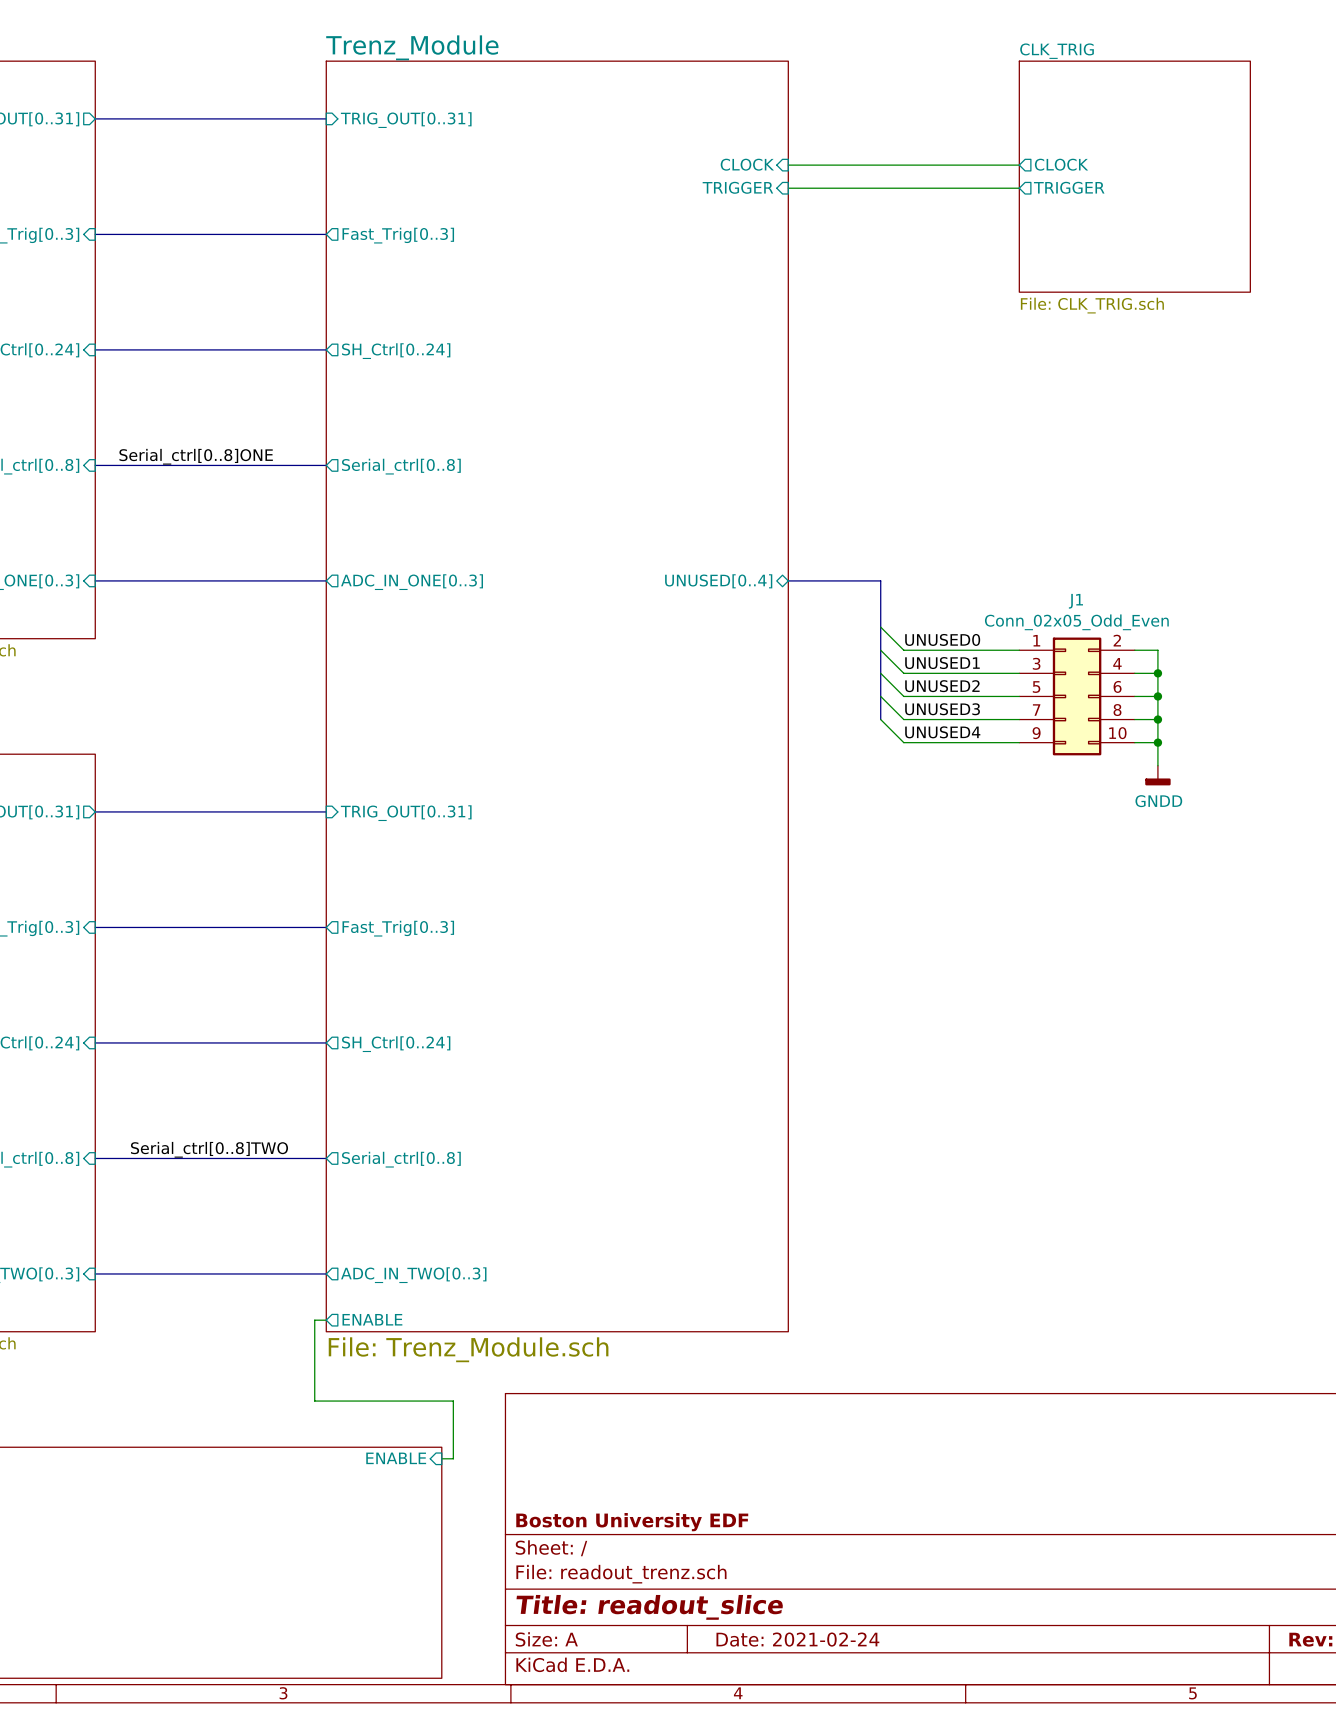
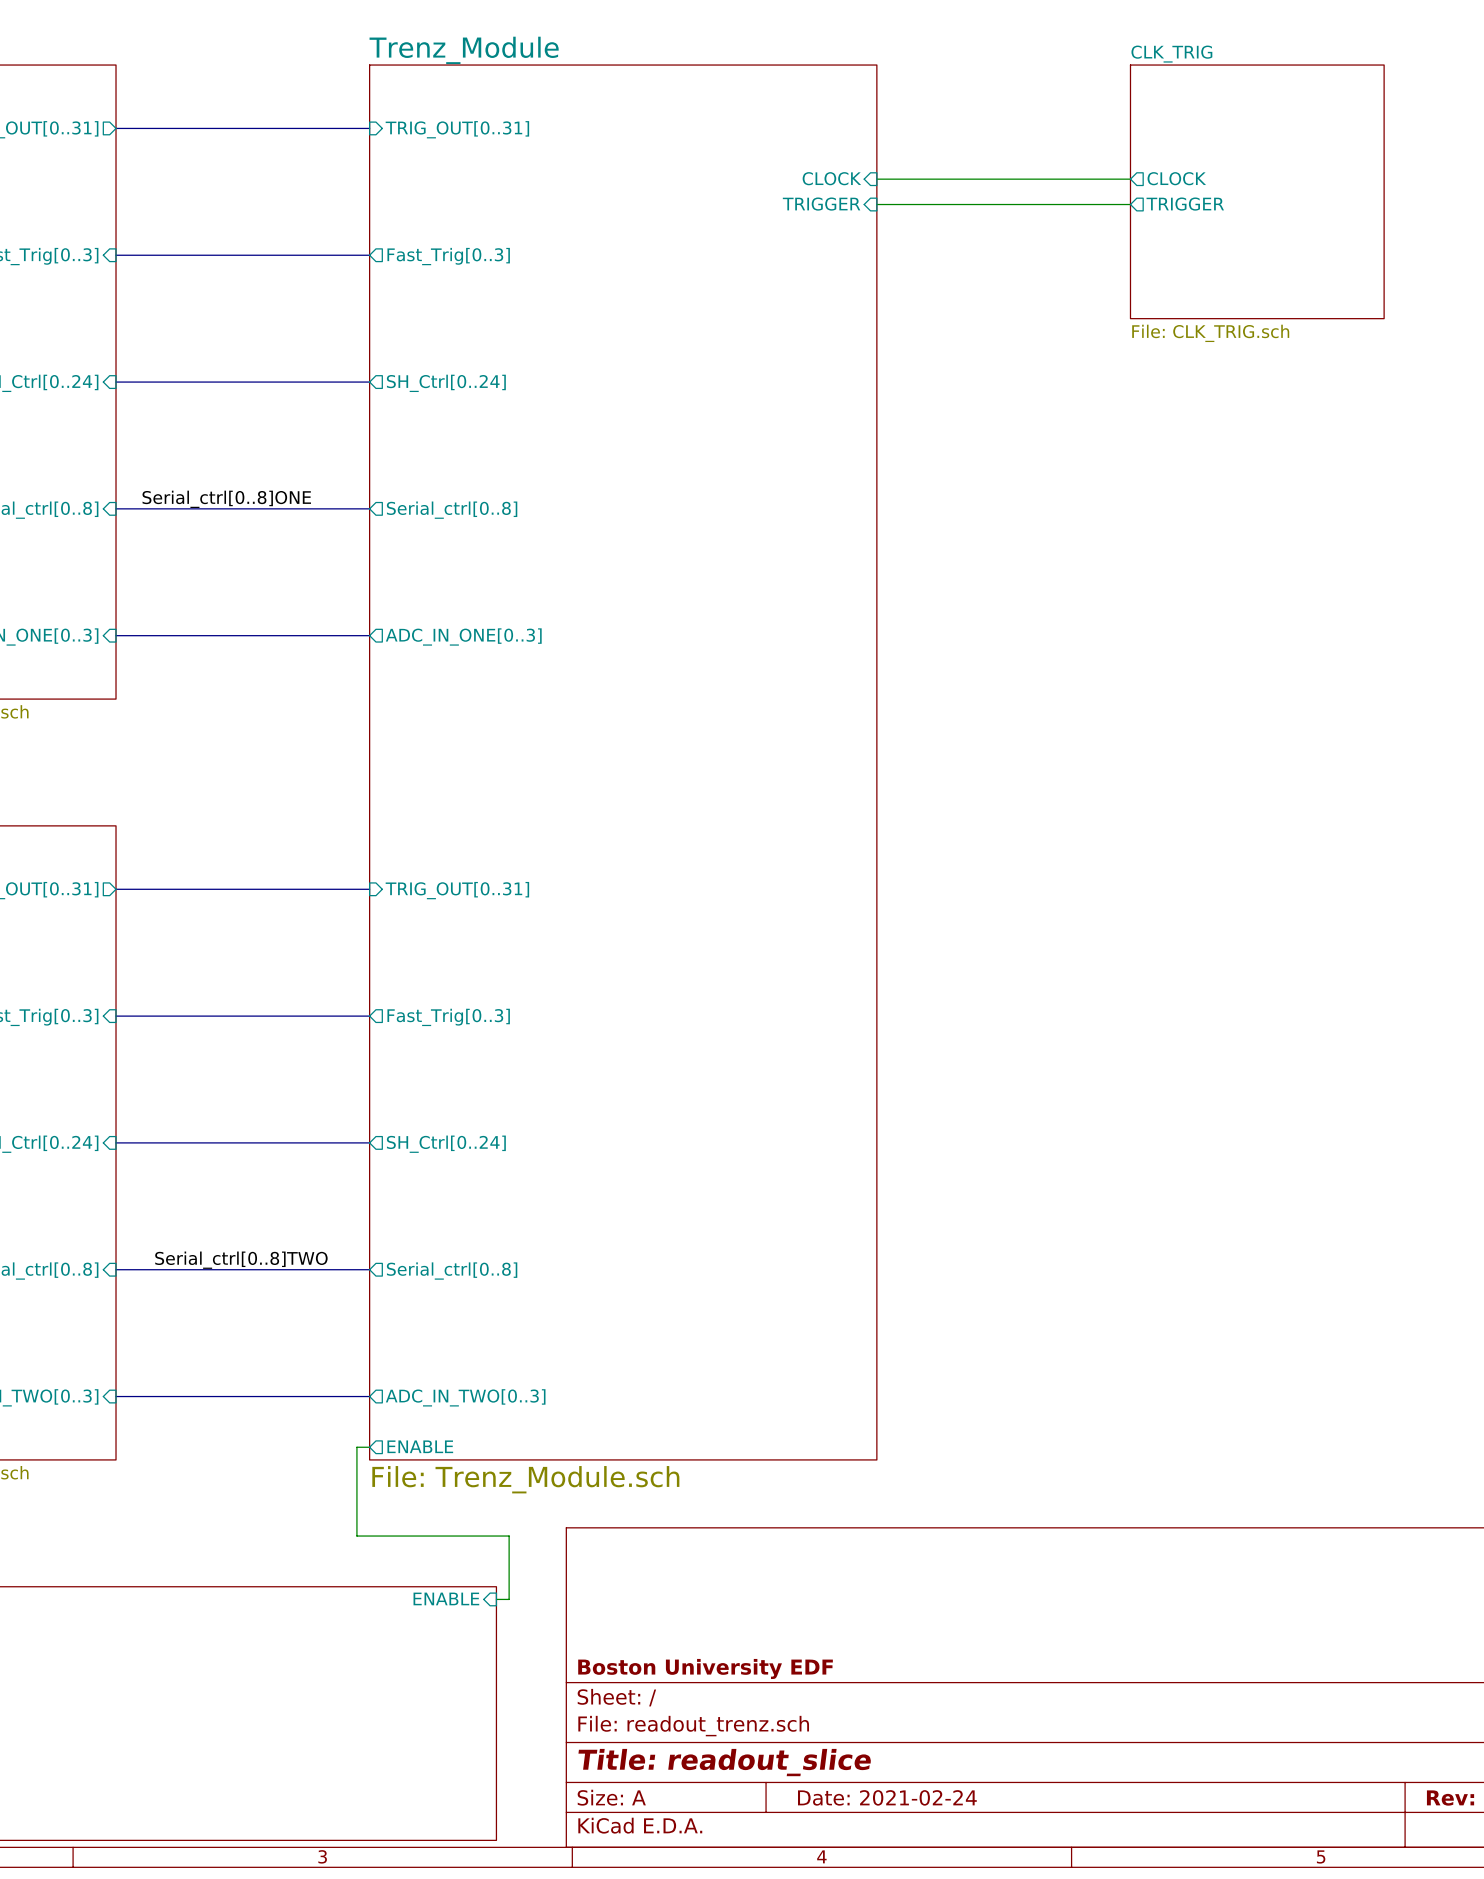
bus: (788, 580) (880, 580) (880, 719) -> none
sheet pin: UNUSED[0..4] (718, 581) -> none
wire: (880, 627) (903, 650) (1019, 650) -> none
label: UNUSED0 (942, 639) -> none
wire: (880, 650) (903, 673) (1019, 673) -> none
wire: (1134, 650) (1157, 650) (1157, 765) -> none
label: UNUSED1 (942, 663) -> none
wire: (880, 673) (903, 696) (1019, 696) -> none
wire: (1134, 673) (1157, 673) -> none
junction: (1157, 673) -> none
label: UNUSED2 (942, 686) -> none
wire: (880, 696) (903, 719) (1019, 719) -> none
J1: Conn_02x05_Odd_Even (1077, 696) -> none
wire: (1134, 696) (1157, 696) -> none
junction: (1157, 696) -> none
label: UNUSED3 (942, 709) -> none
wire: (880, 719) (903, 742) (1019, 742) -> none
wire: (1134, 719) (1157, 719) -> none
junction: (1157, 719) -> none
label: UNUSED4 (942, 732) -> none
wire: (1134, 742) (1157, 742) -> none
junction: (1157, 742) -> none
power symbol: GNDD (1157, 775) -> none

